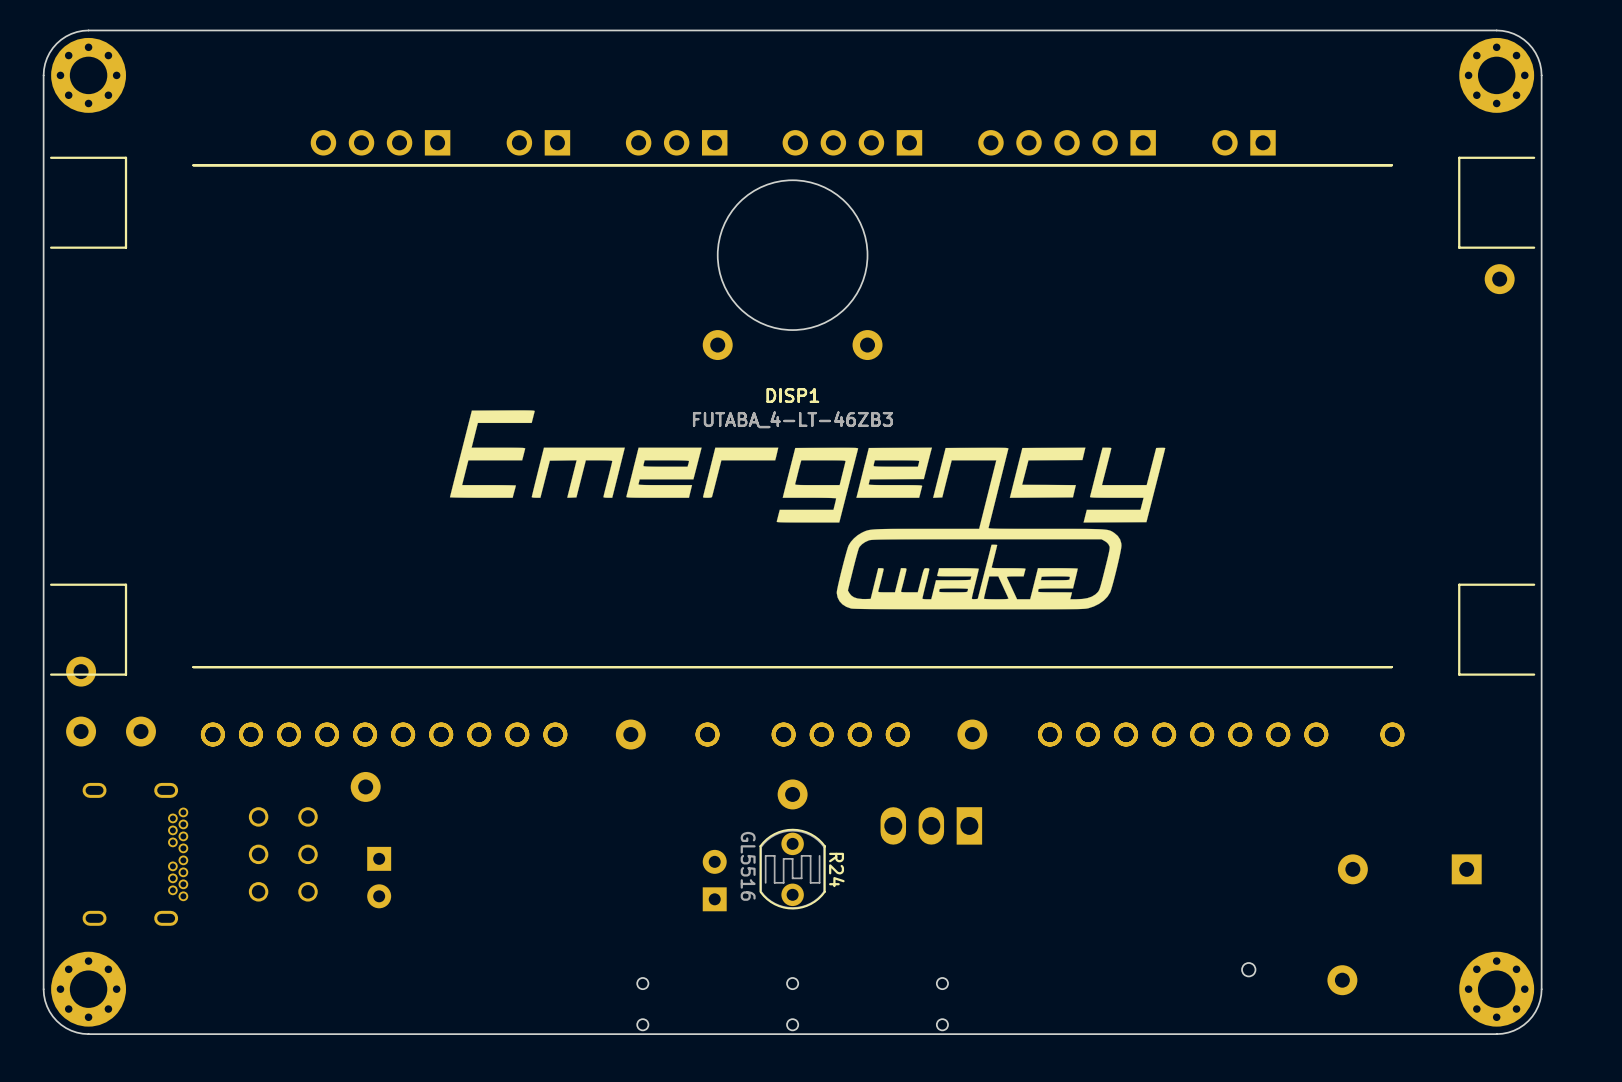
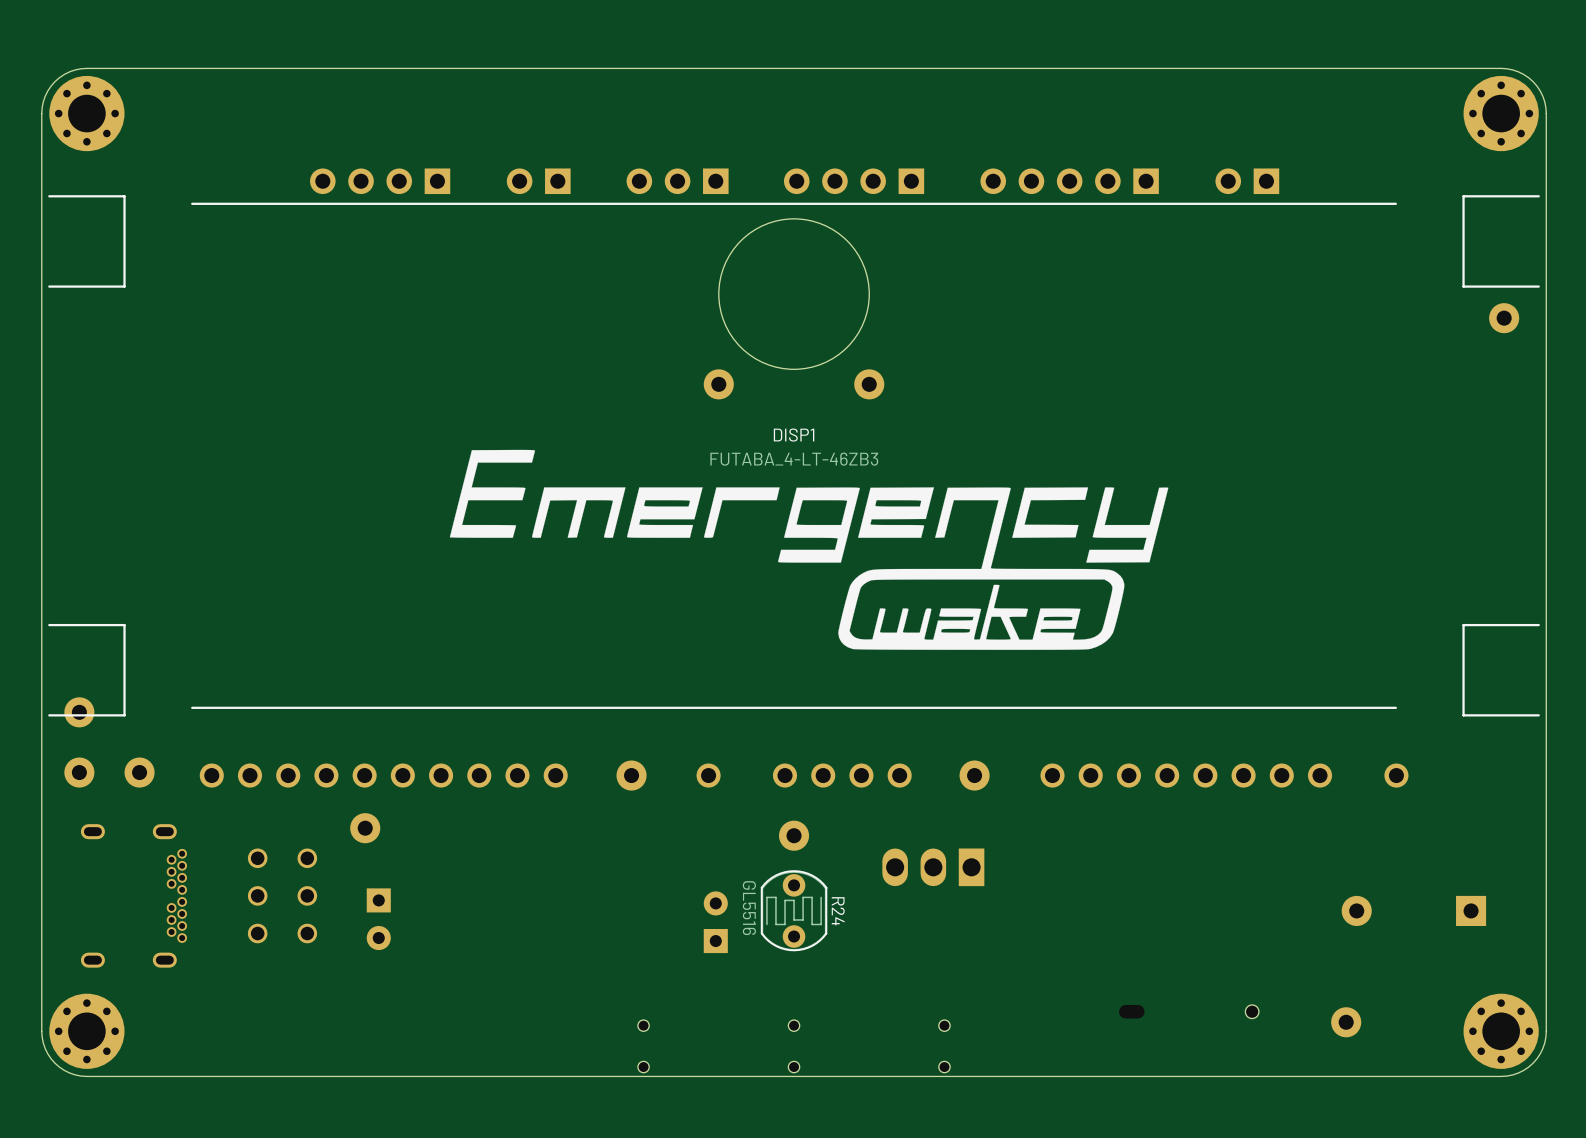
DISP1: FUTABA_4-LT-46ZB3 (798, 455) -> none

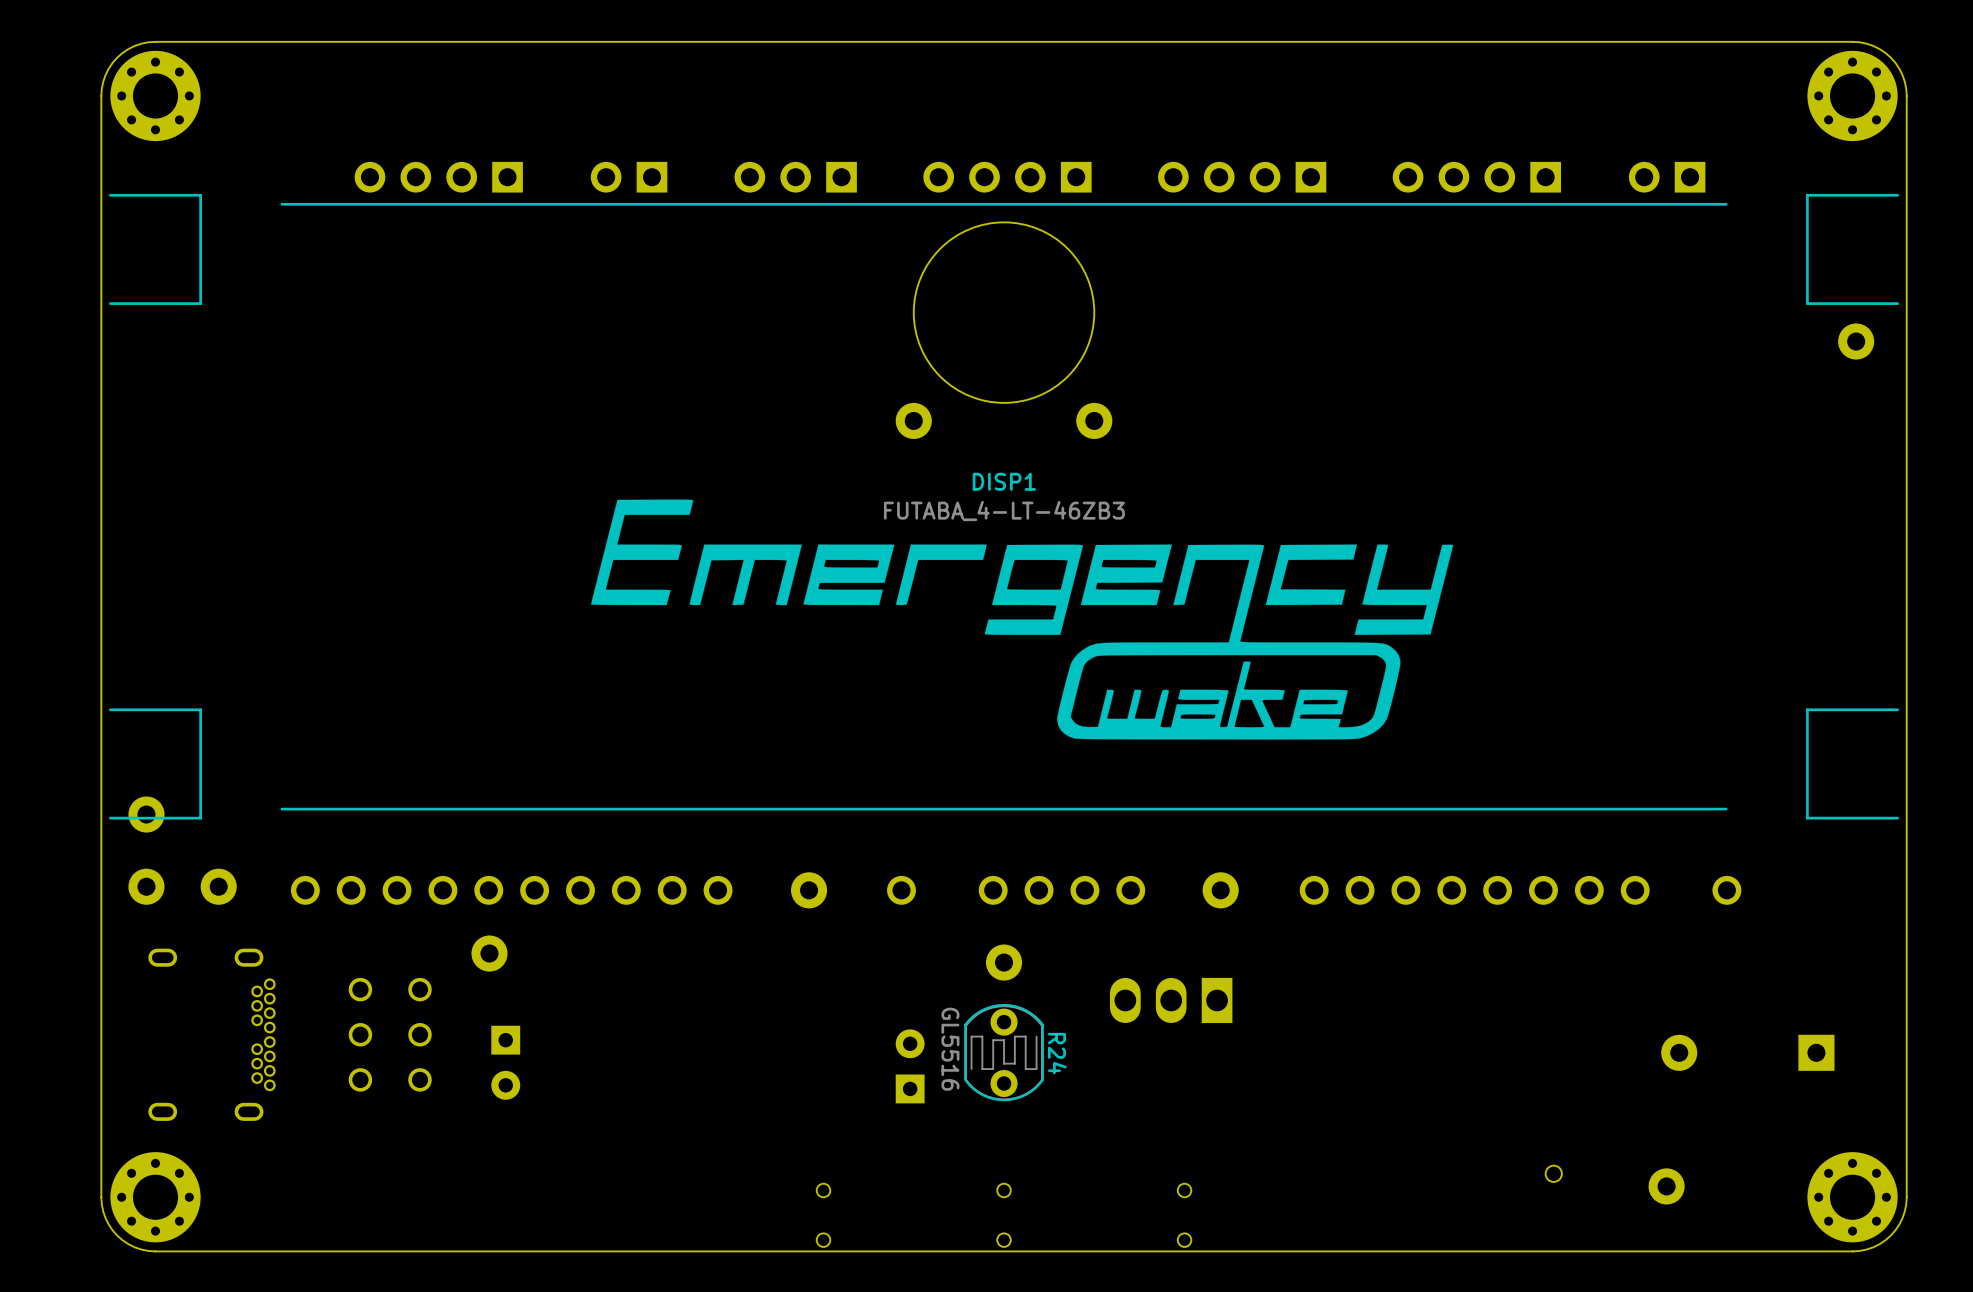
part position: (380, 181) -> (438, 177)
part position: (538, 181) -> (629, 177)
part position: (677, 181) -> (795, 177)
part position: (854, 181) -> (1007, 177)
part: none -> (1242, 177)
part: (1069, 181) -> none
part: none -> (1476, 177)
part position: (1247, 181) -> (1667, 177)

